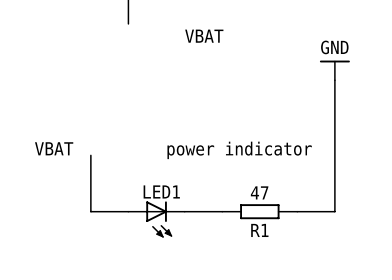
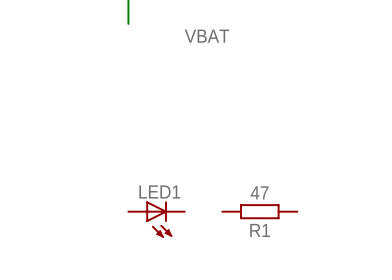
power symbol: GND (334, 70) -> none
wire: (334, 80) (334, 211) (297, 211) -> none
label: VBAT (54, 148) -> none
text: power indicator (239, 150) -> none
wire: (90, 155) (90, 211) (128, 211) -> none
wire: (184, 211) (222, 211) -> none

